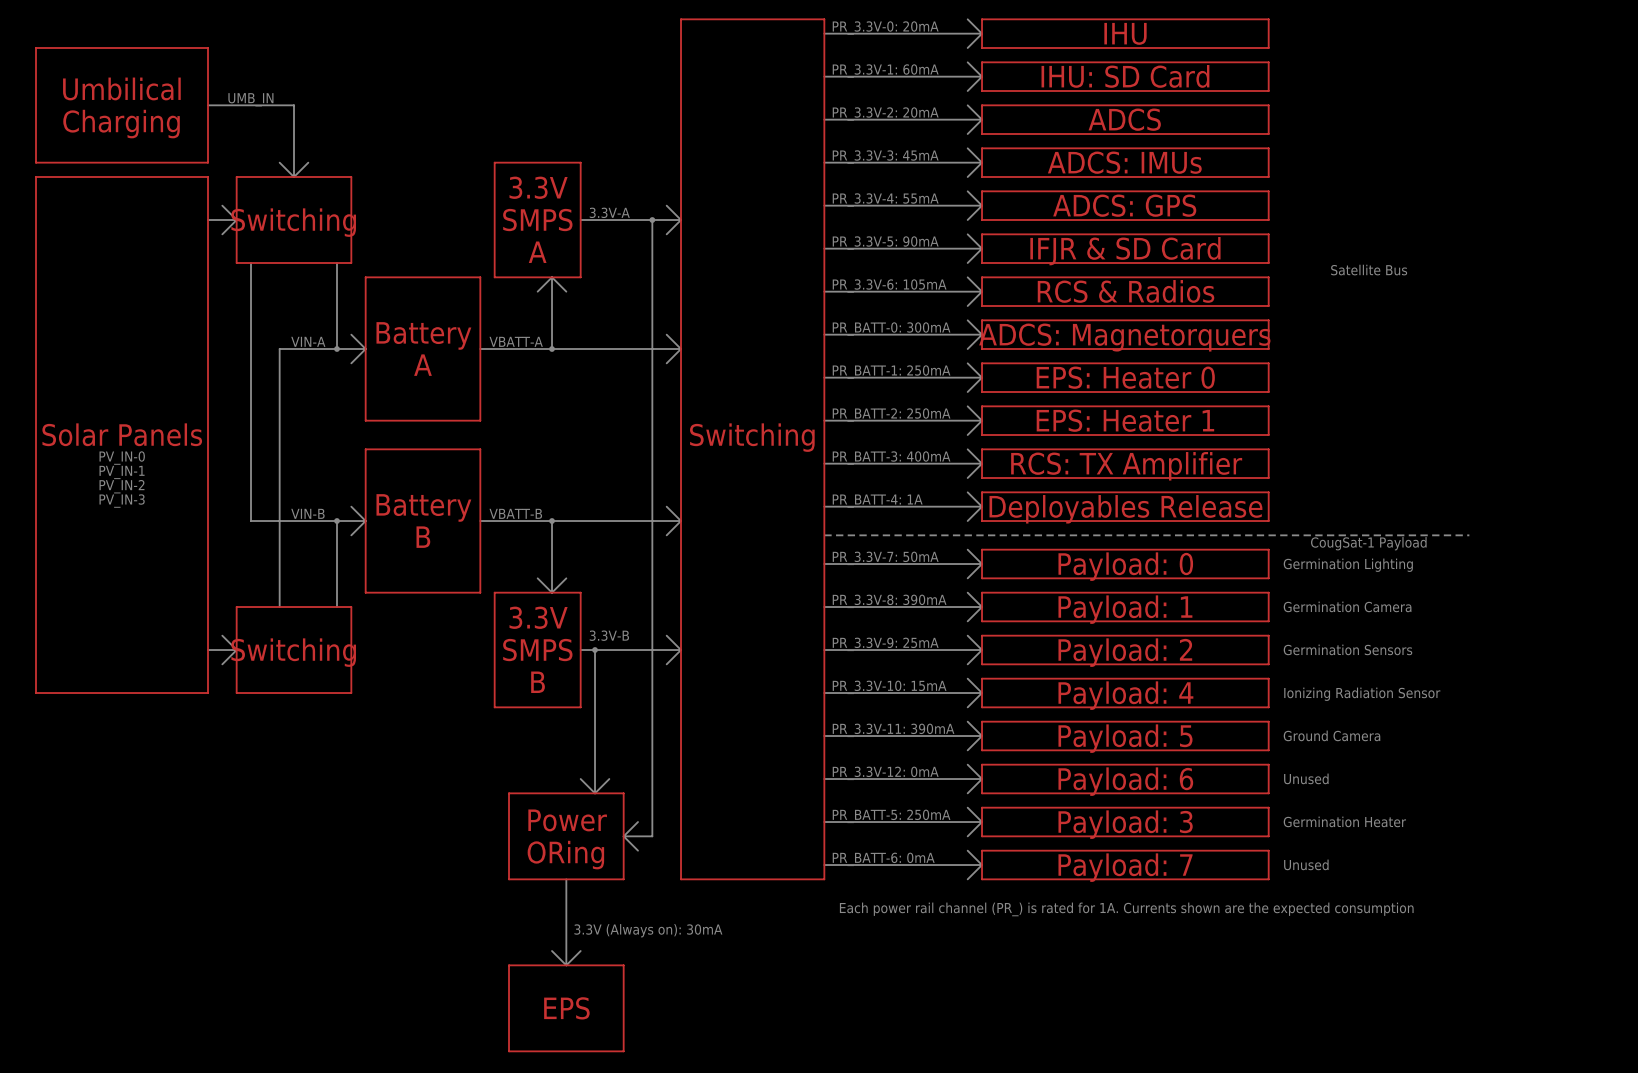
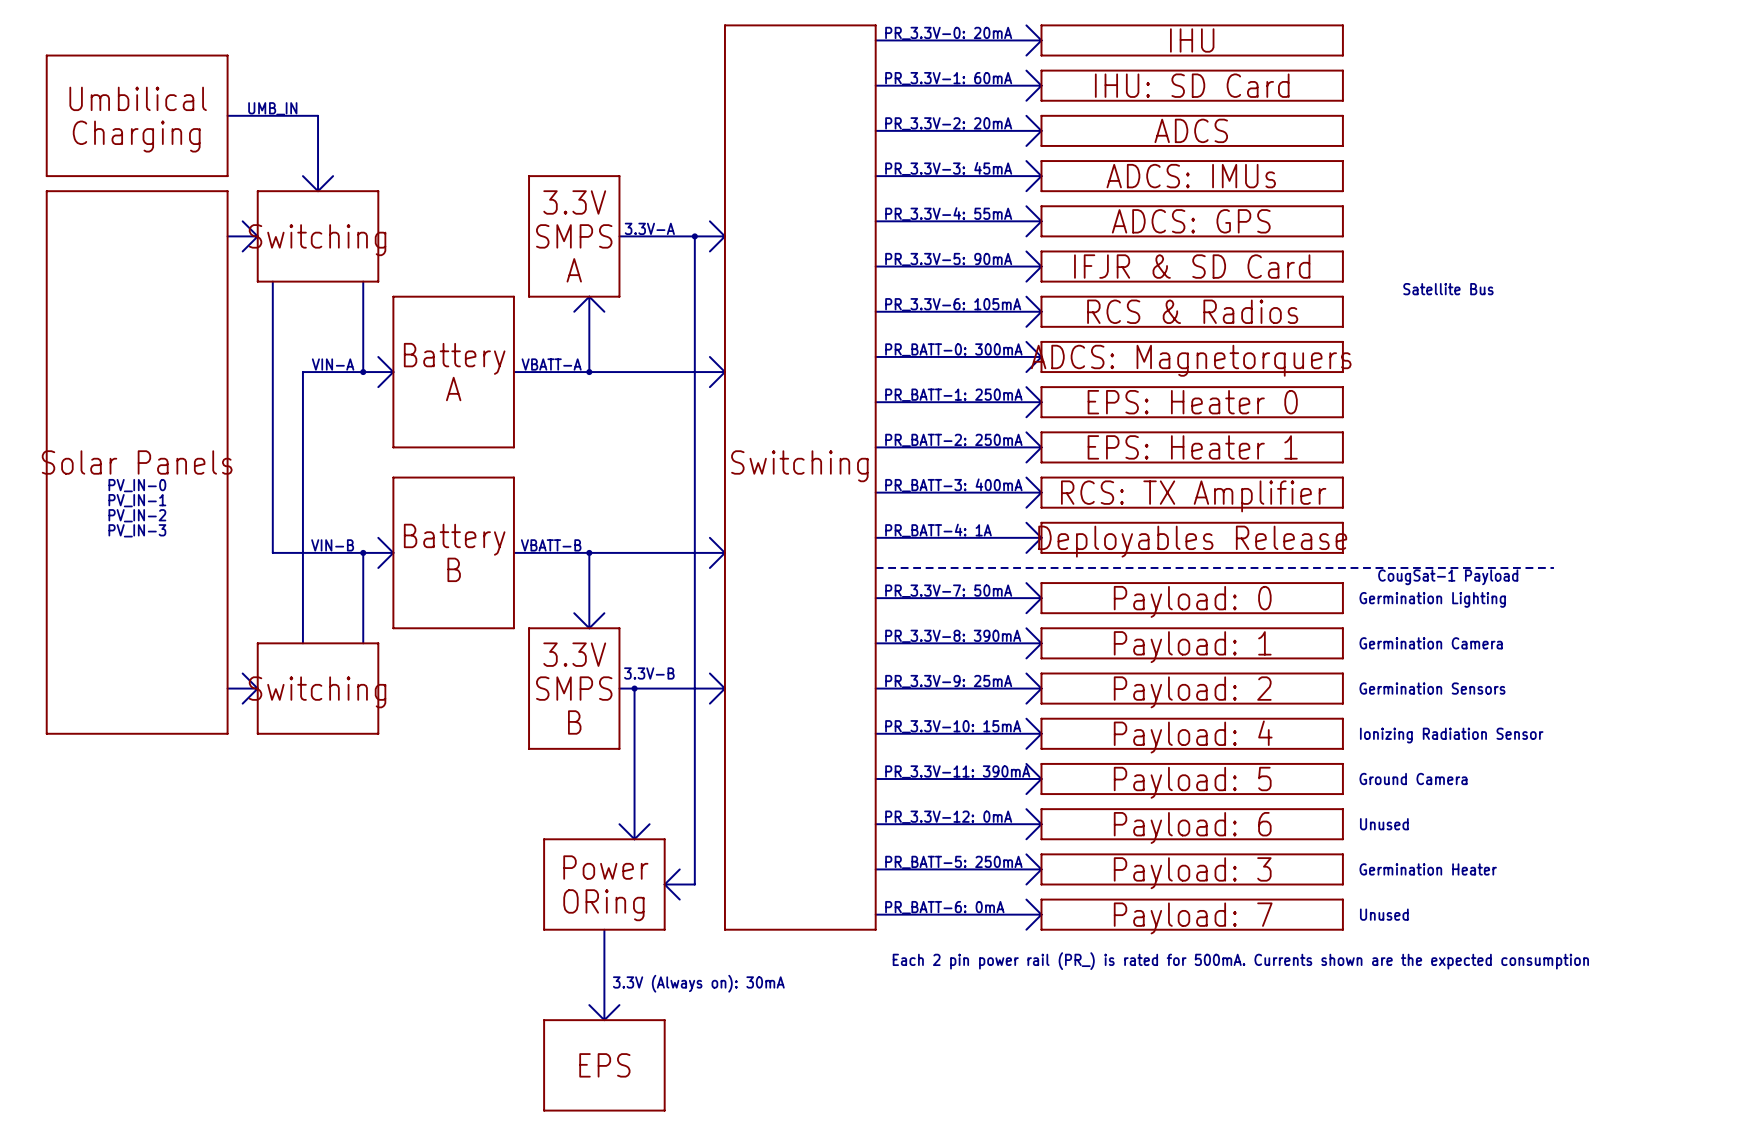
text: Each power rail channel (PR_) is rated for 1A. Currents shown are the expected consumption (1126, 909) -> Each 2 pin power rail (PR_) is rated for 500mA. Currents shown are the expected consumption (1240, 961)

